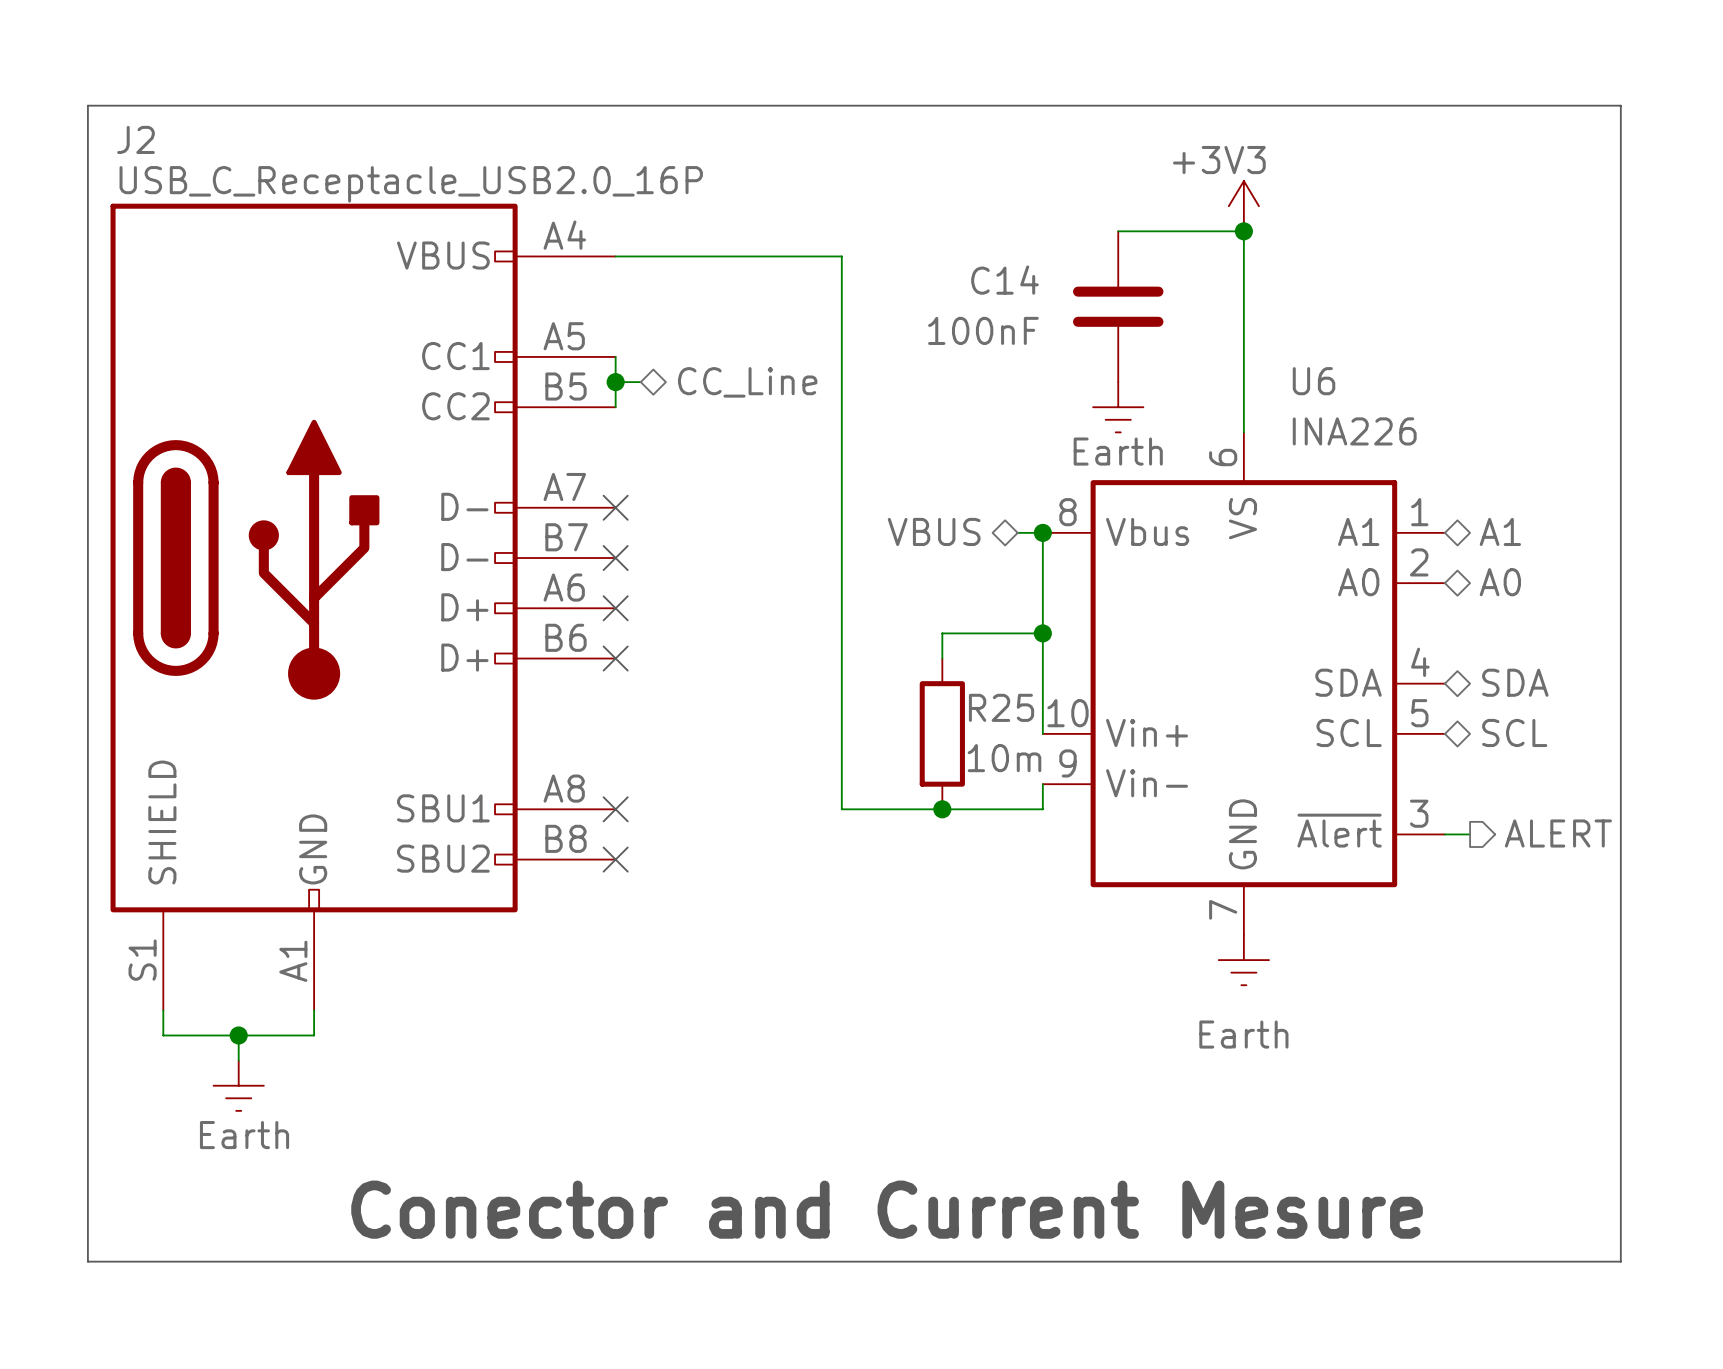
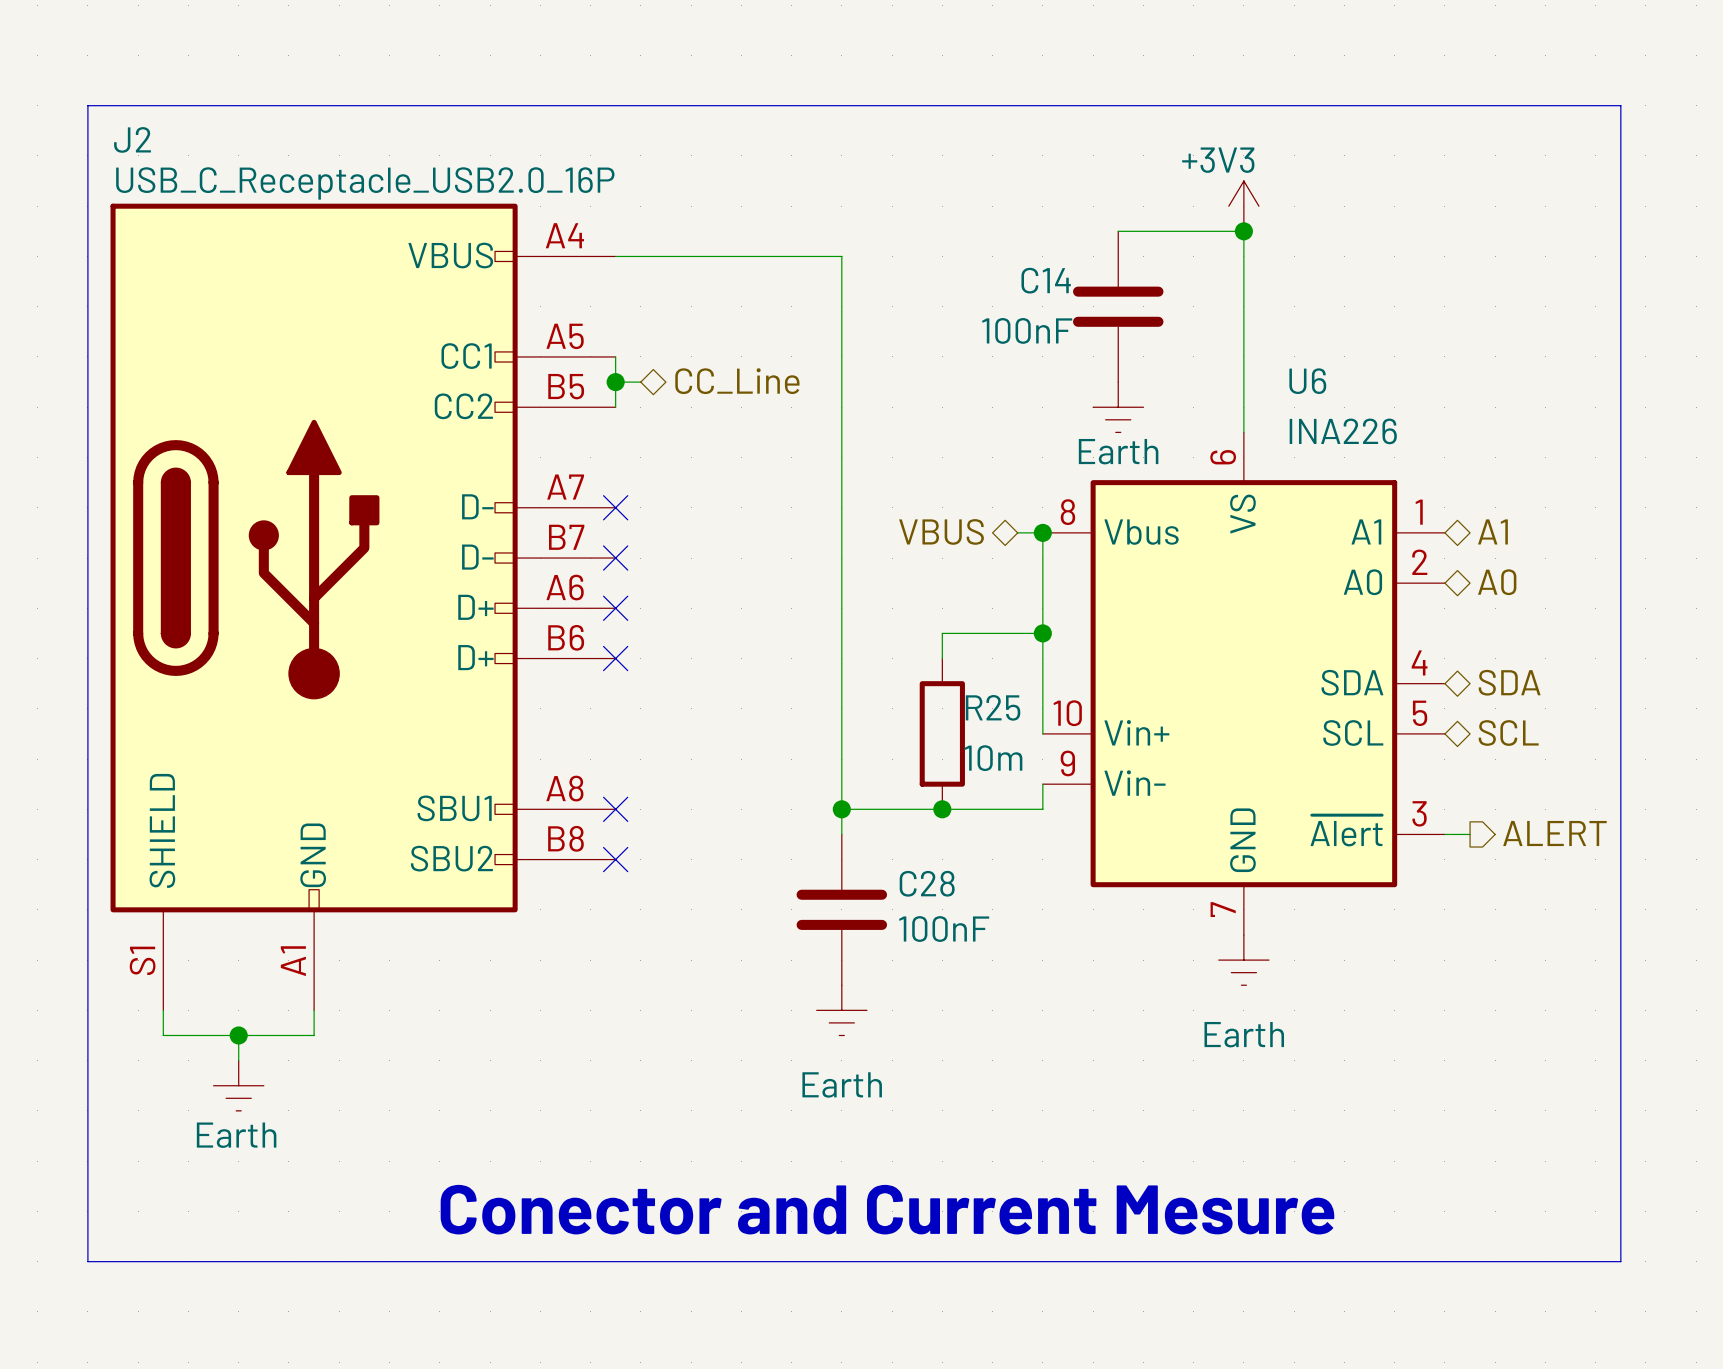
C14 name position: C14 (1004, 280) -> C14 (1046, 280)
C14 value position: 100nF (983, 330) -> 100nF (1027, 330)
wire: none -> (841, 809) (841, 834)
junction: none -> (841, 809)
C28: none -> 100nF (841, 909)
power symbol: none -> Earth (841, 1010)

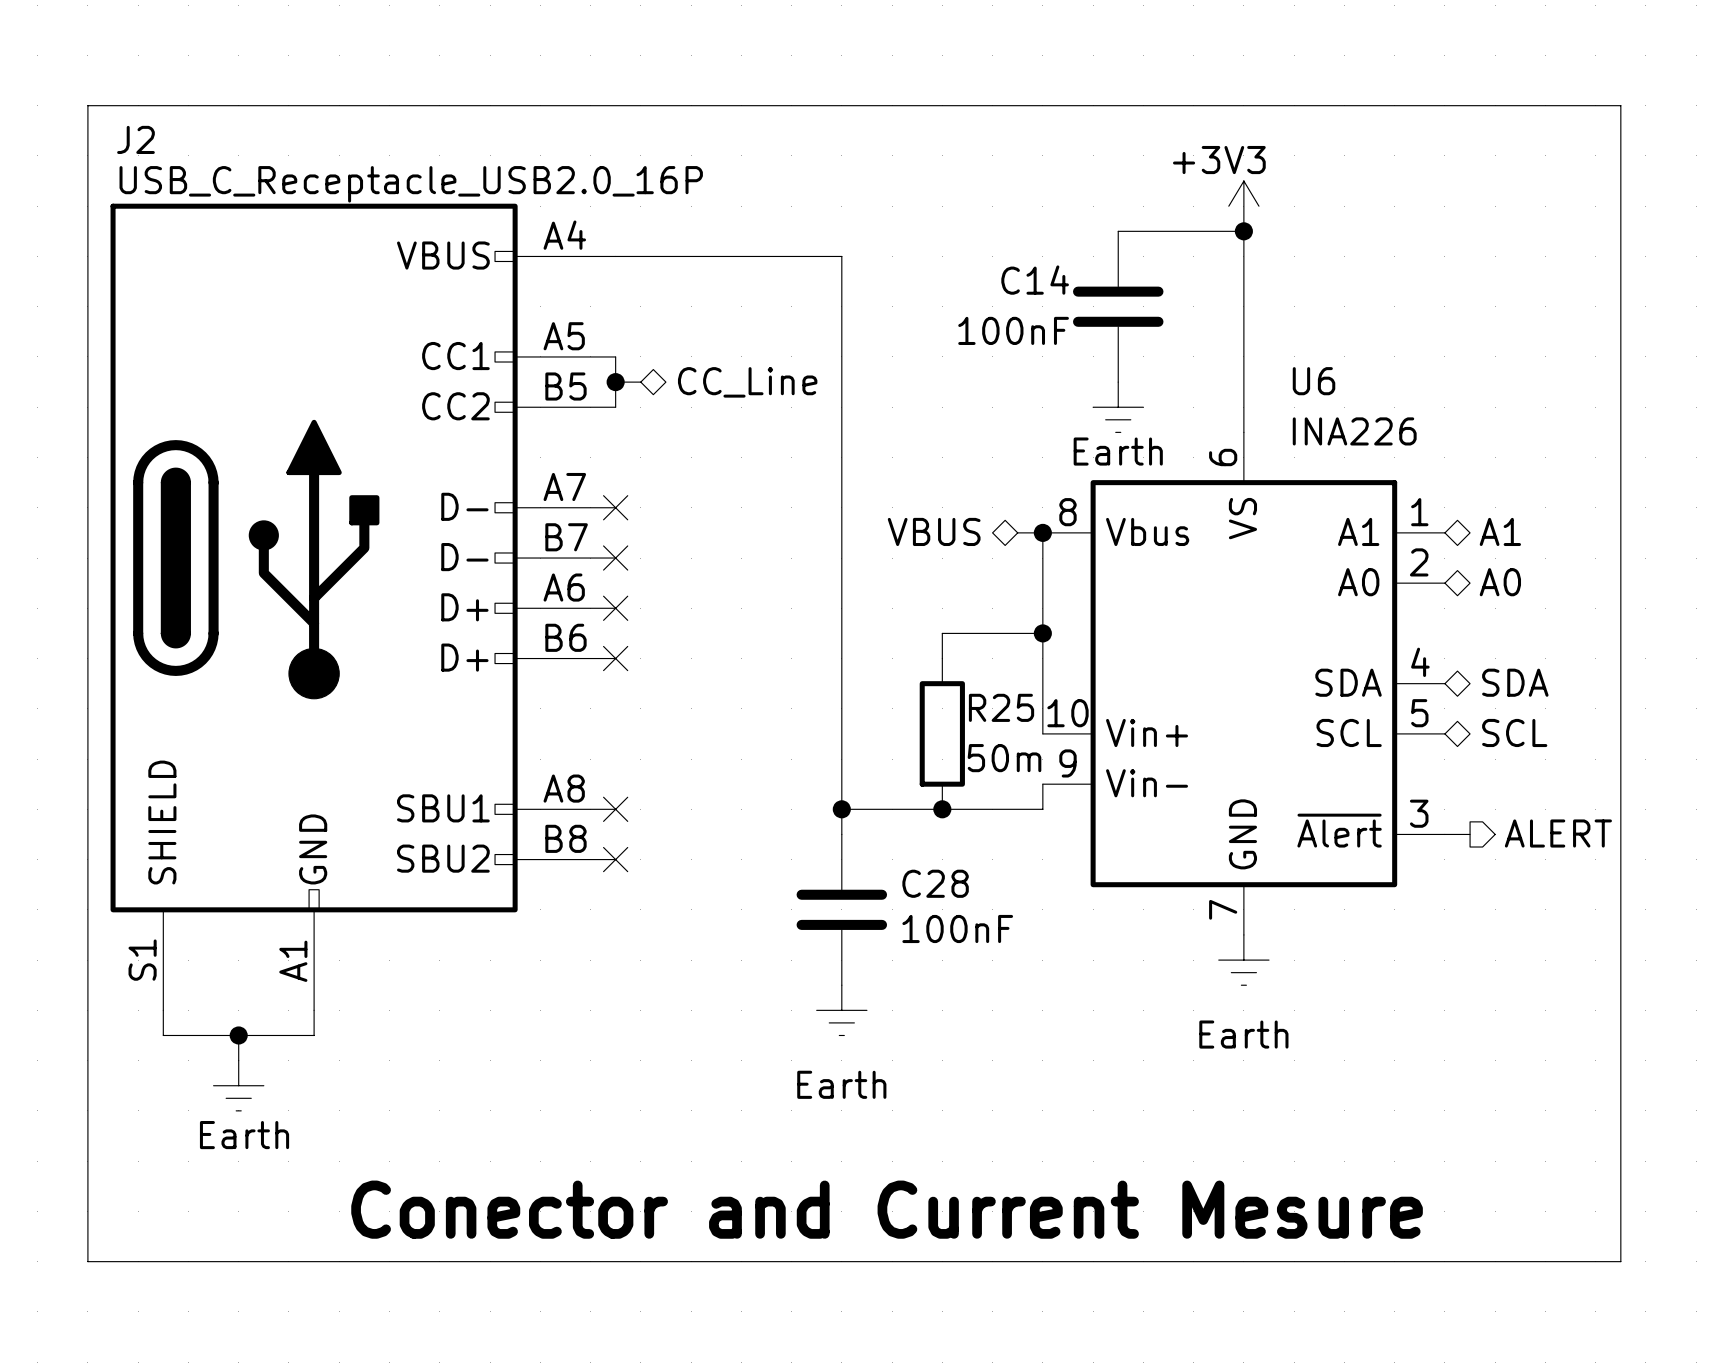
R25 value: 10m (993, 758) -> 50m (1004, 758)

